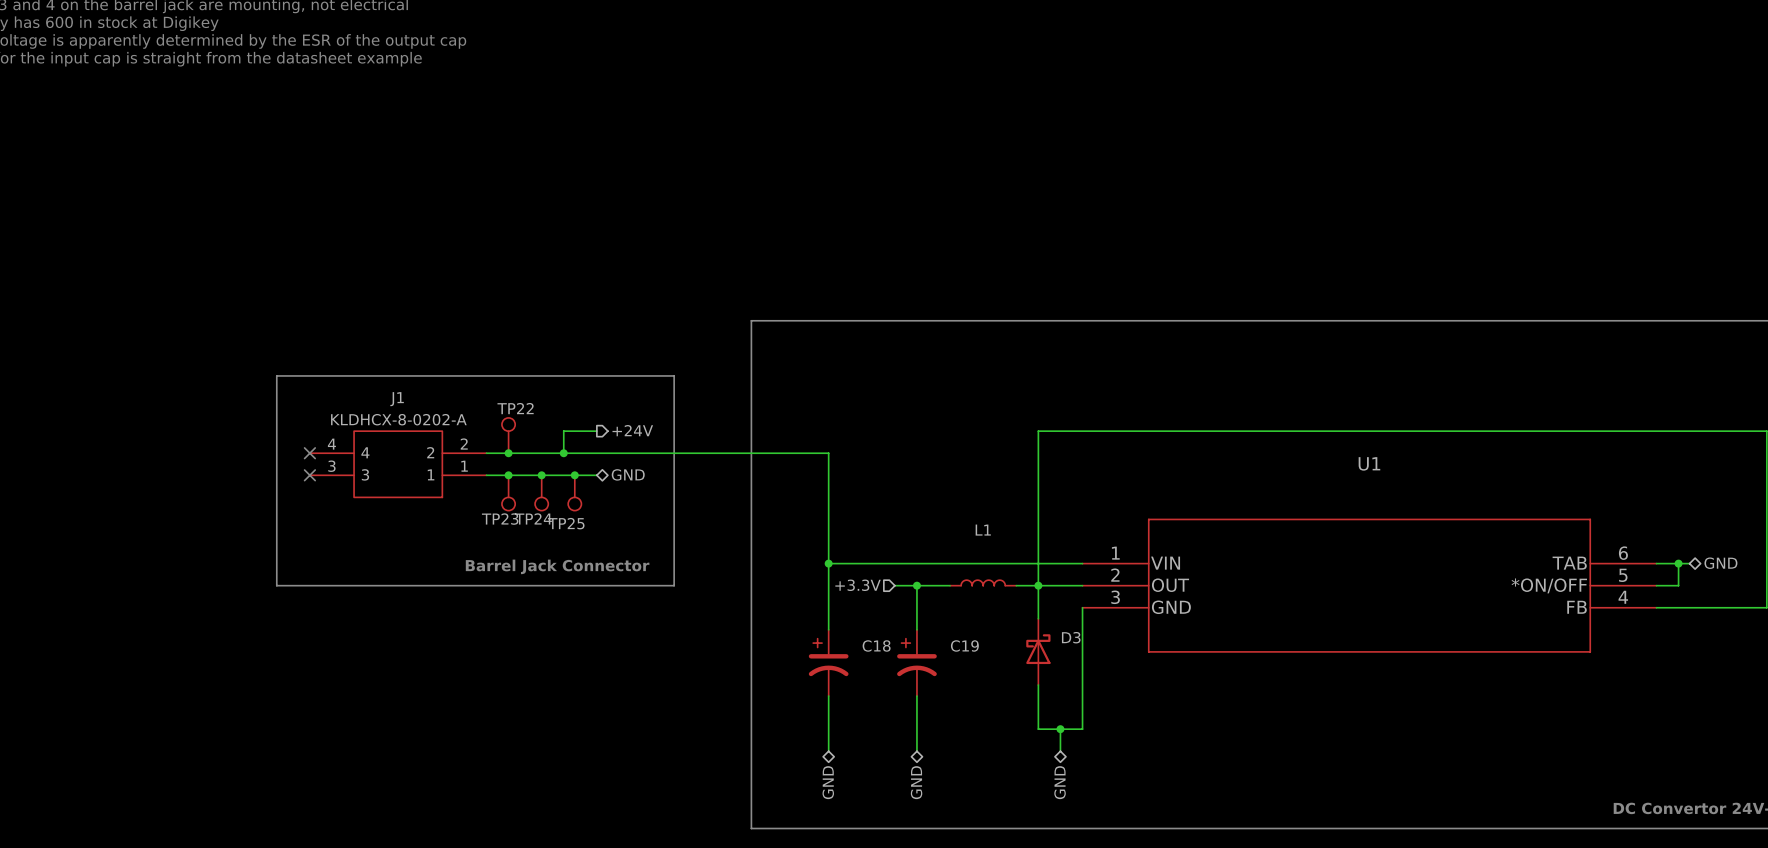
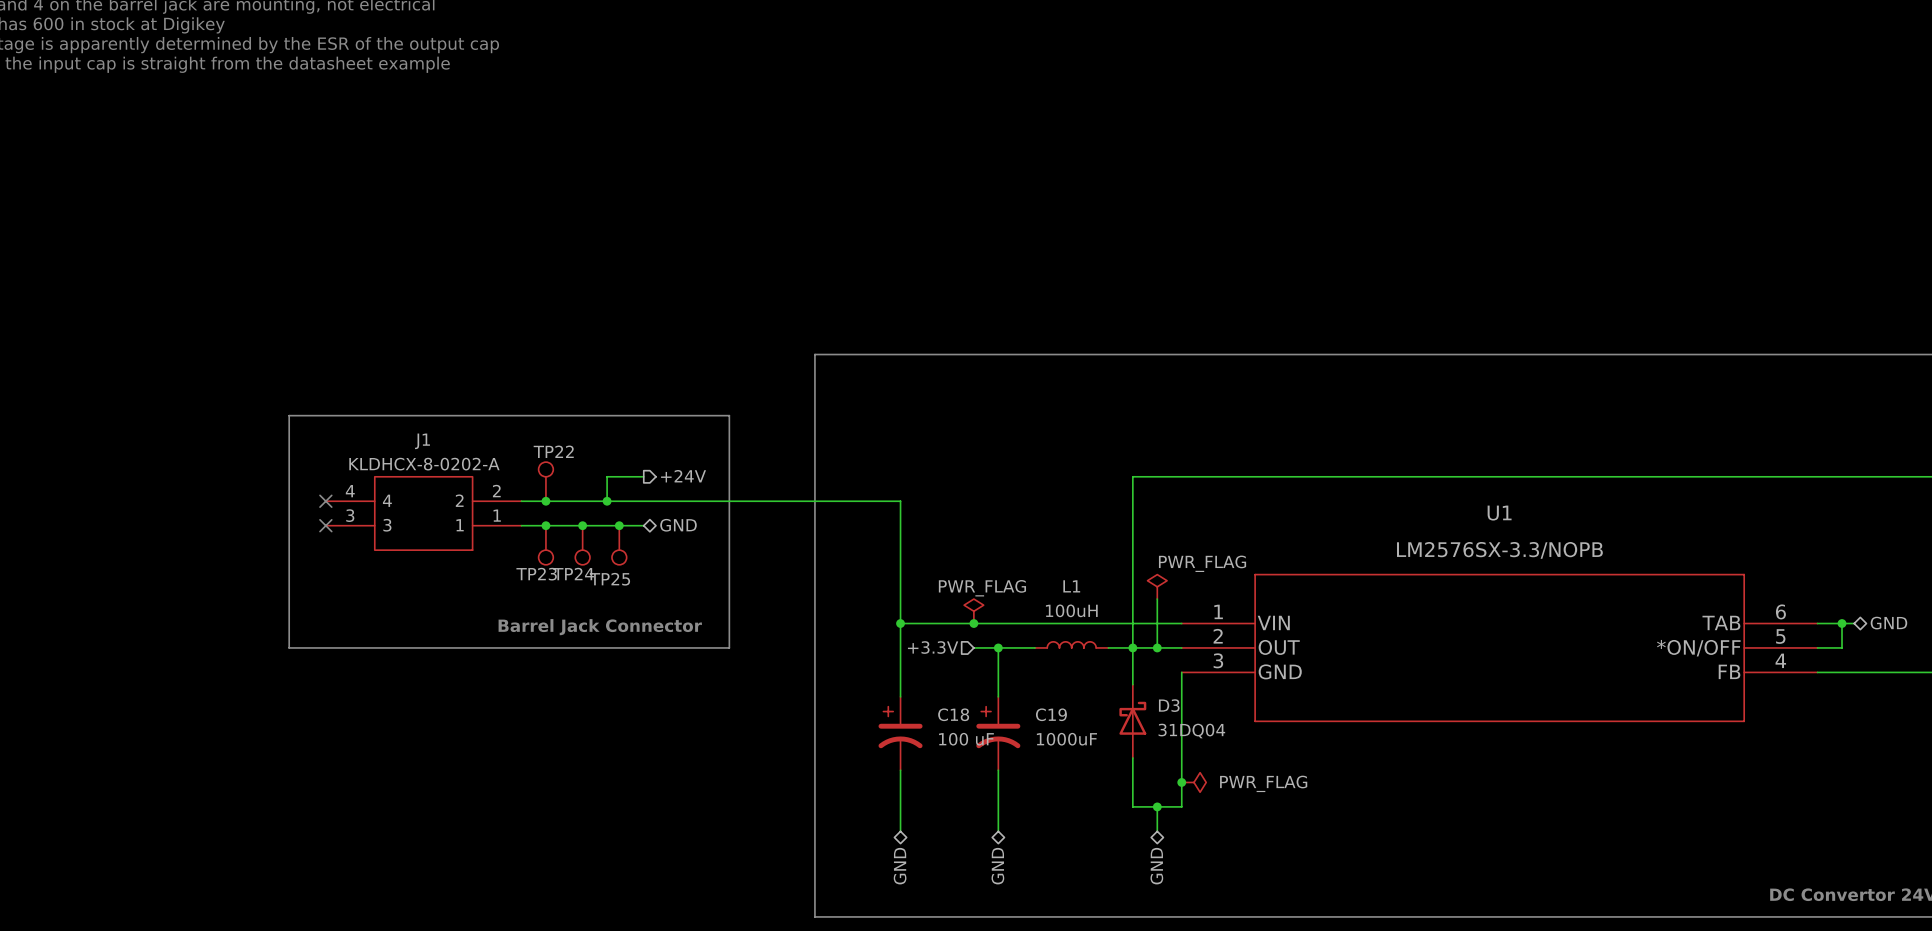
U1 value: none -> LM2576SX-3.3/NOPB (1499, 550)
power symbol: none -> PWR_FLAG (1157, 586)
wire: none -> (1157, 599) (1157, 647)
power symbol: none -> PWR_FLAG (973, 611)
L1 value: none -> 100uH (1071, 610)
junction: none -> (973, 623)
junction: none -> (1157, 647)
D3 value: none -> 31DQ04 (1191, 731)
C18 value: none -> 100 uF (966, 739)
C19 value: none -> 1000uF (1066, 739)
junction: none -> (1181, 782)
power symbol: none -> PWR_FLAG (1193, 782)

